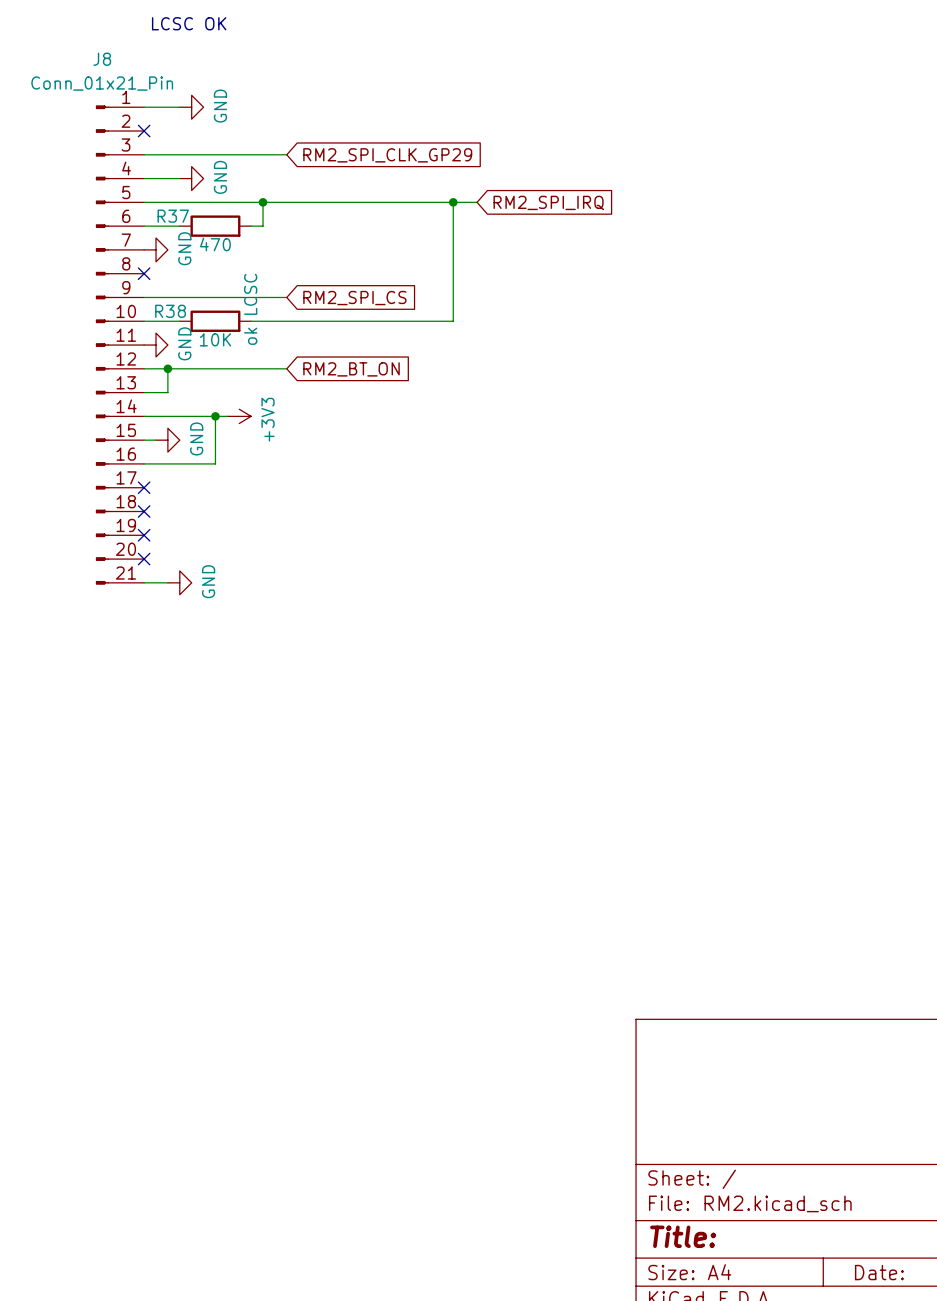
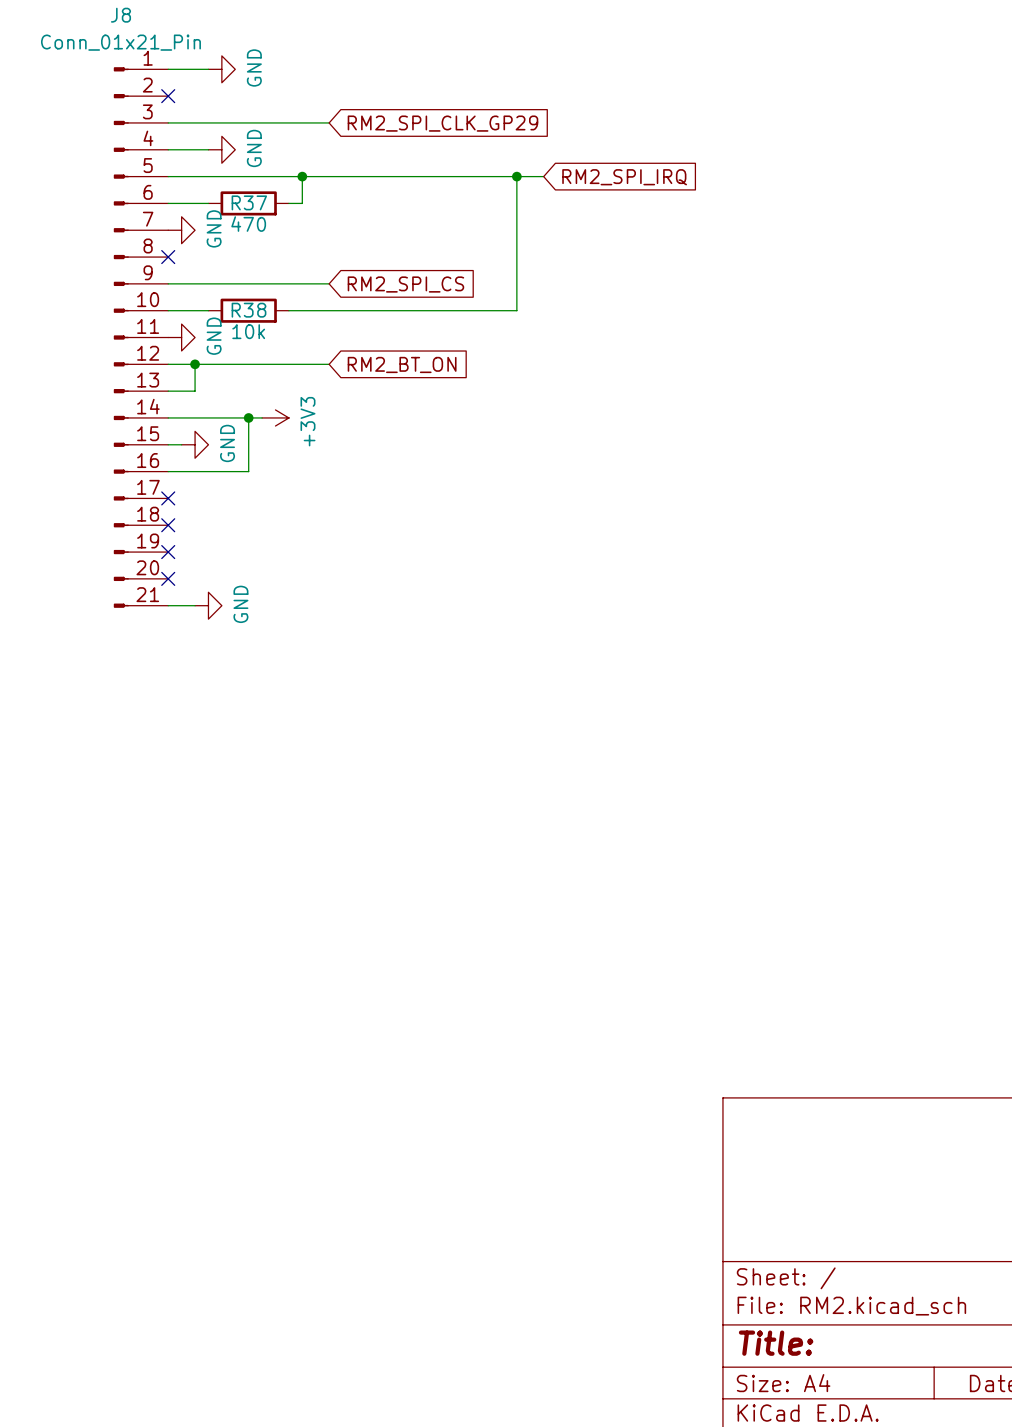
R37 name position: R37 (173, 216) -> R37 (249, 202)
R38 text: ok LCSC (250, 309) -> none
R38 name position: R38 (170, 311) -> R38 (249, 310)
R38 value: 10K (215, 339) -> 10k (248, 331)

